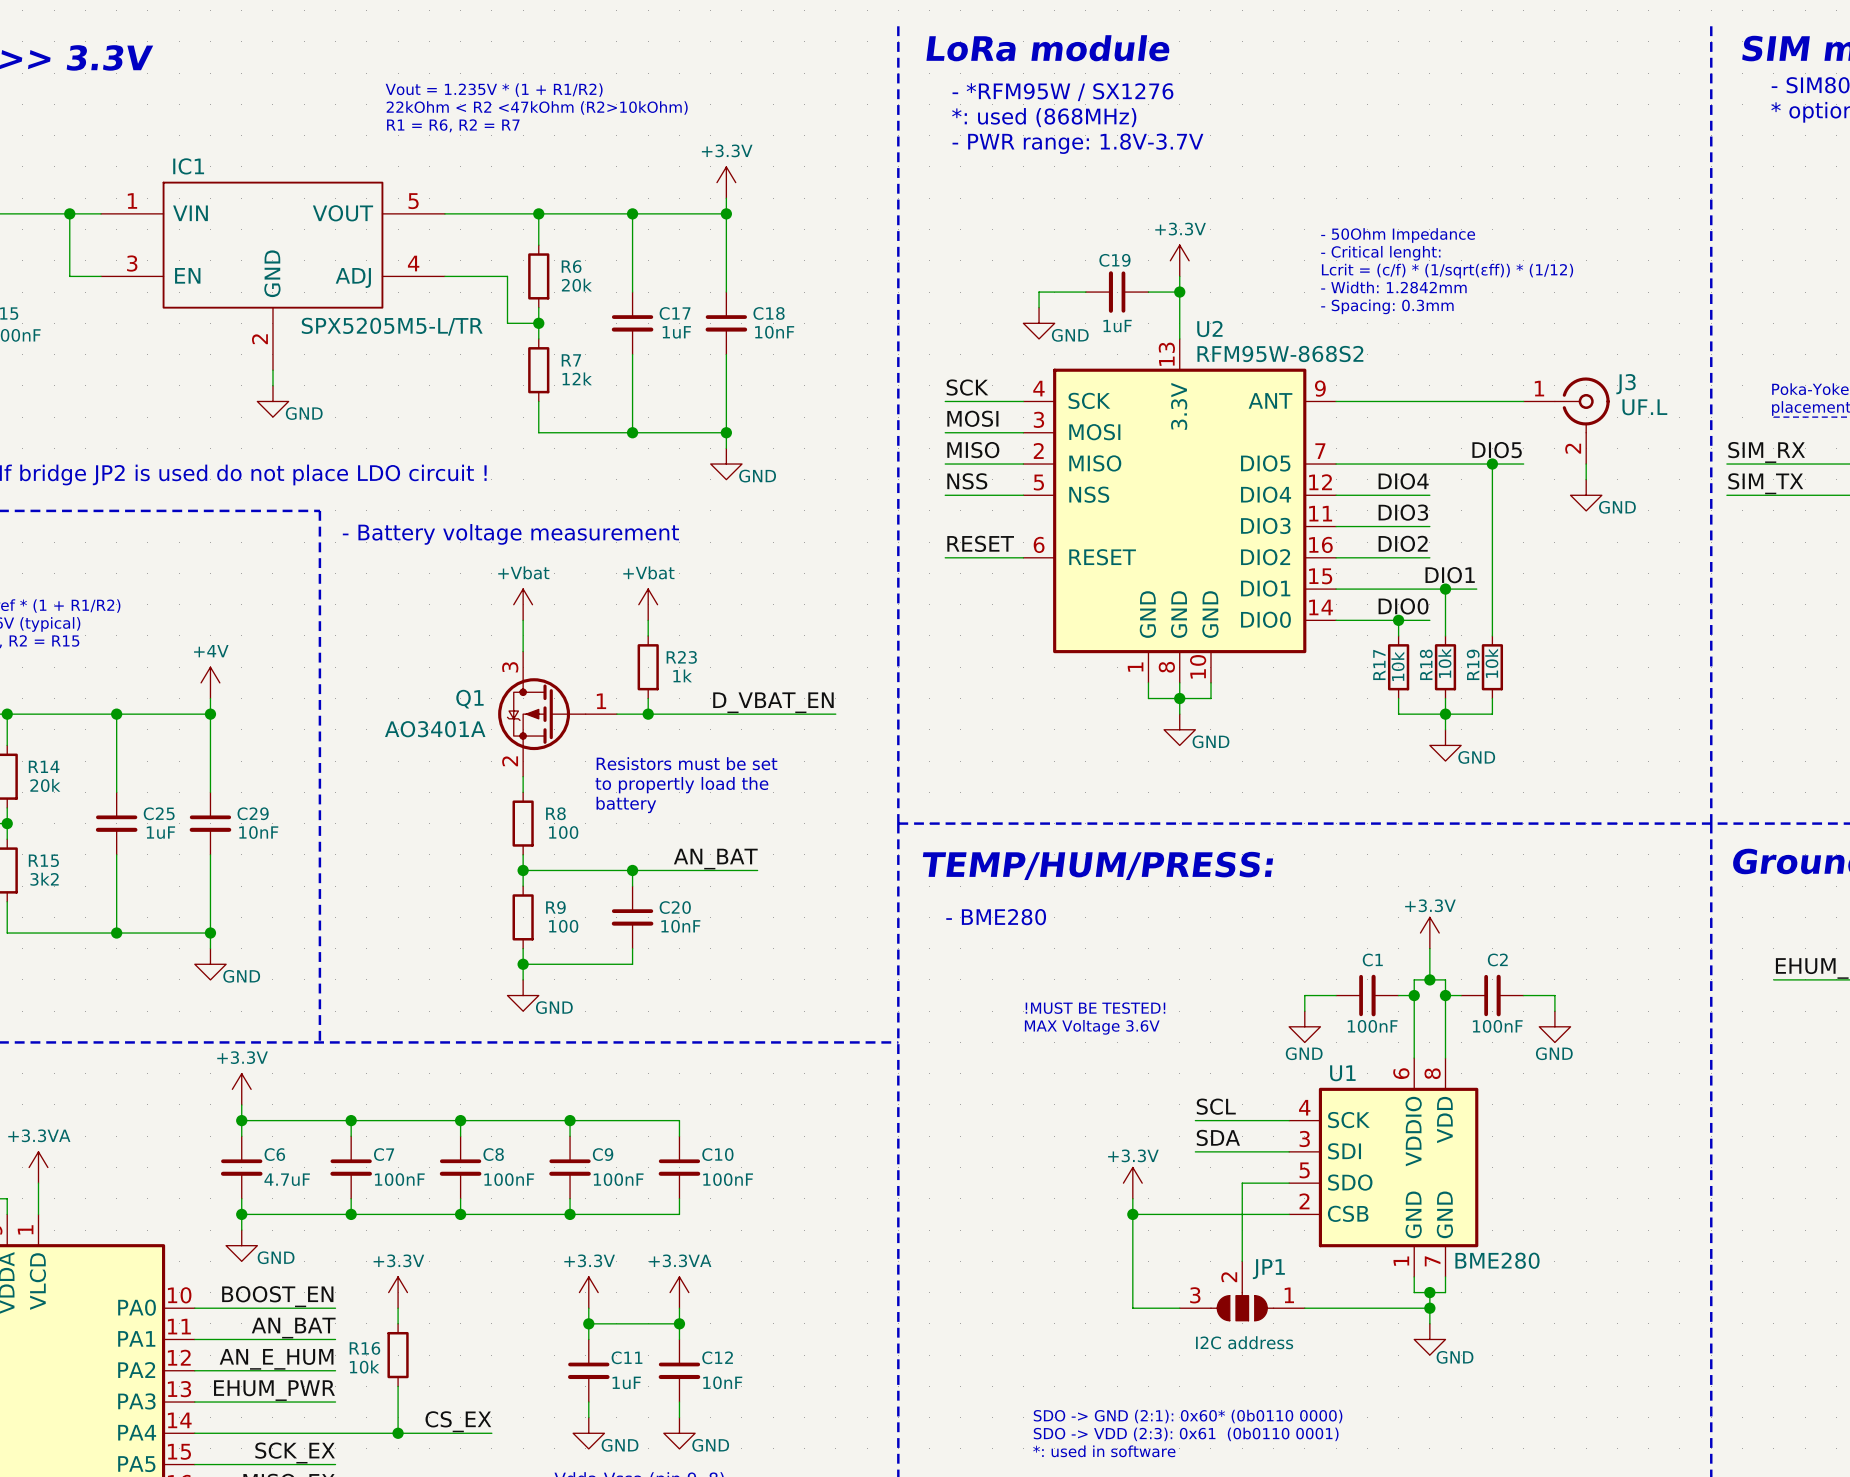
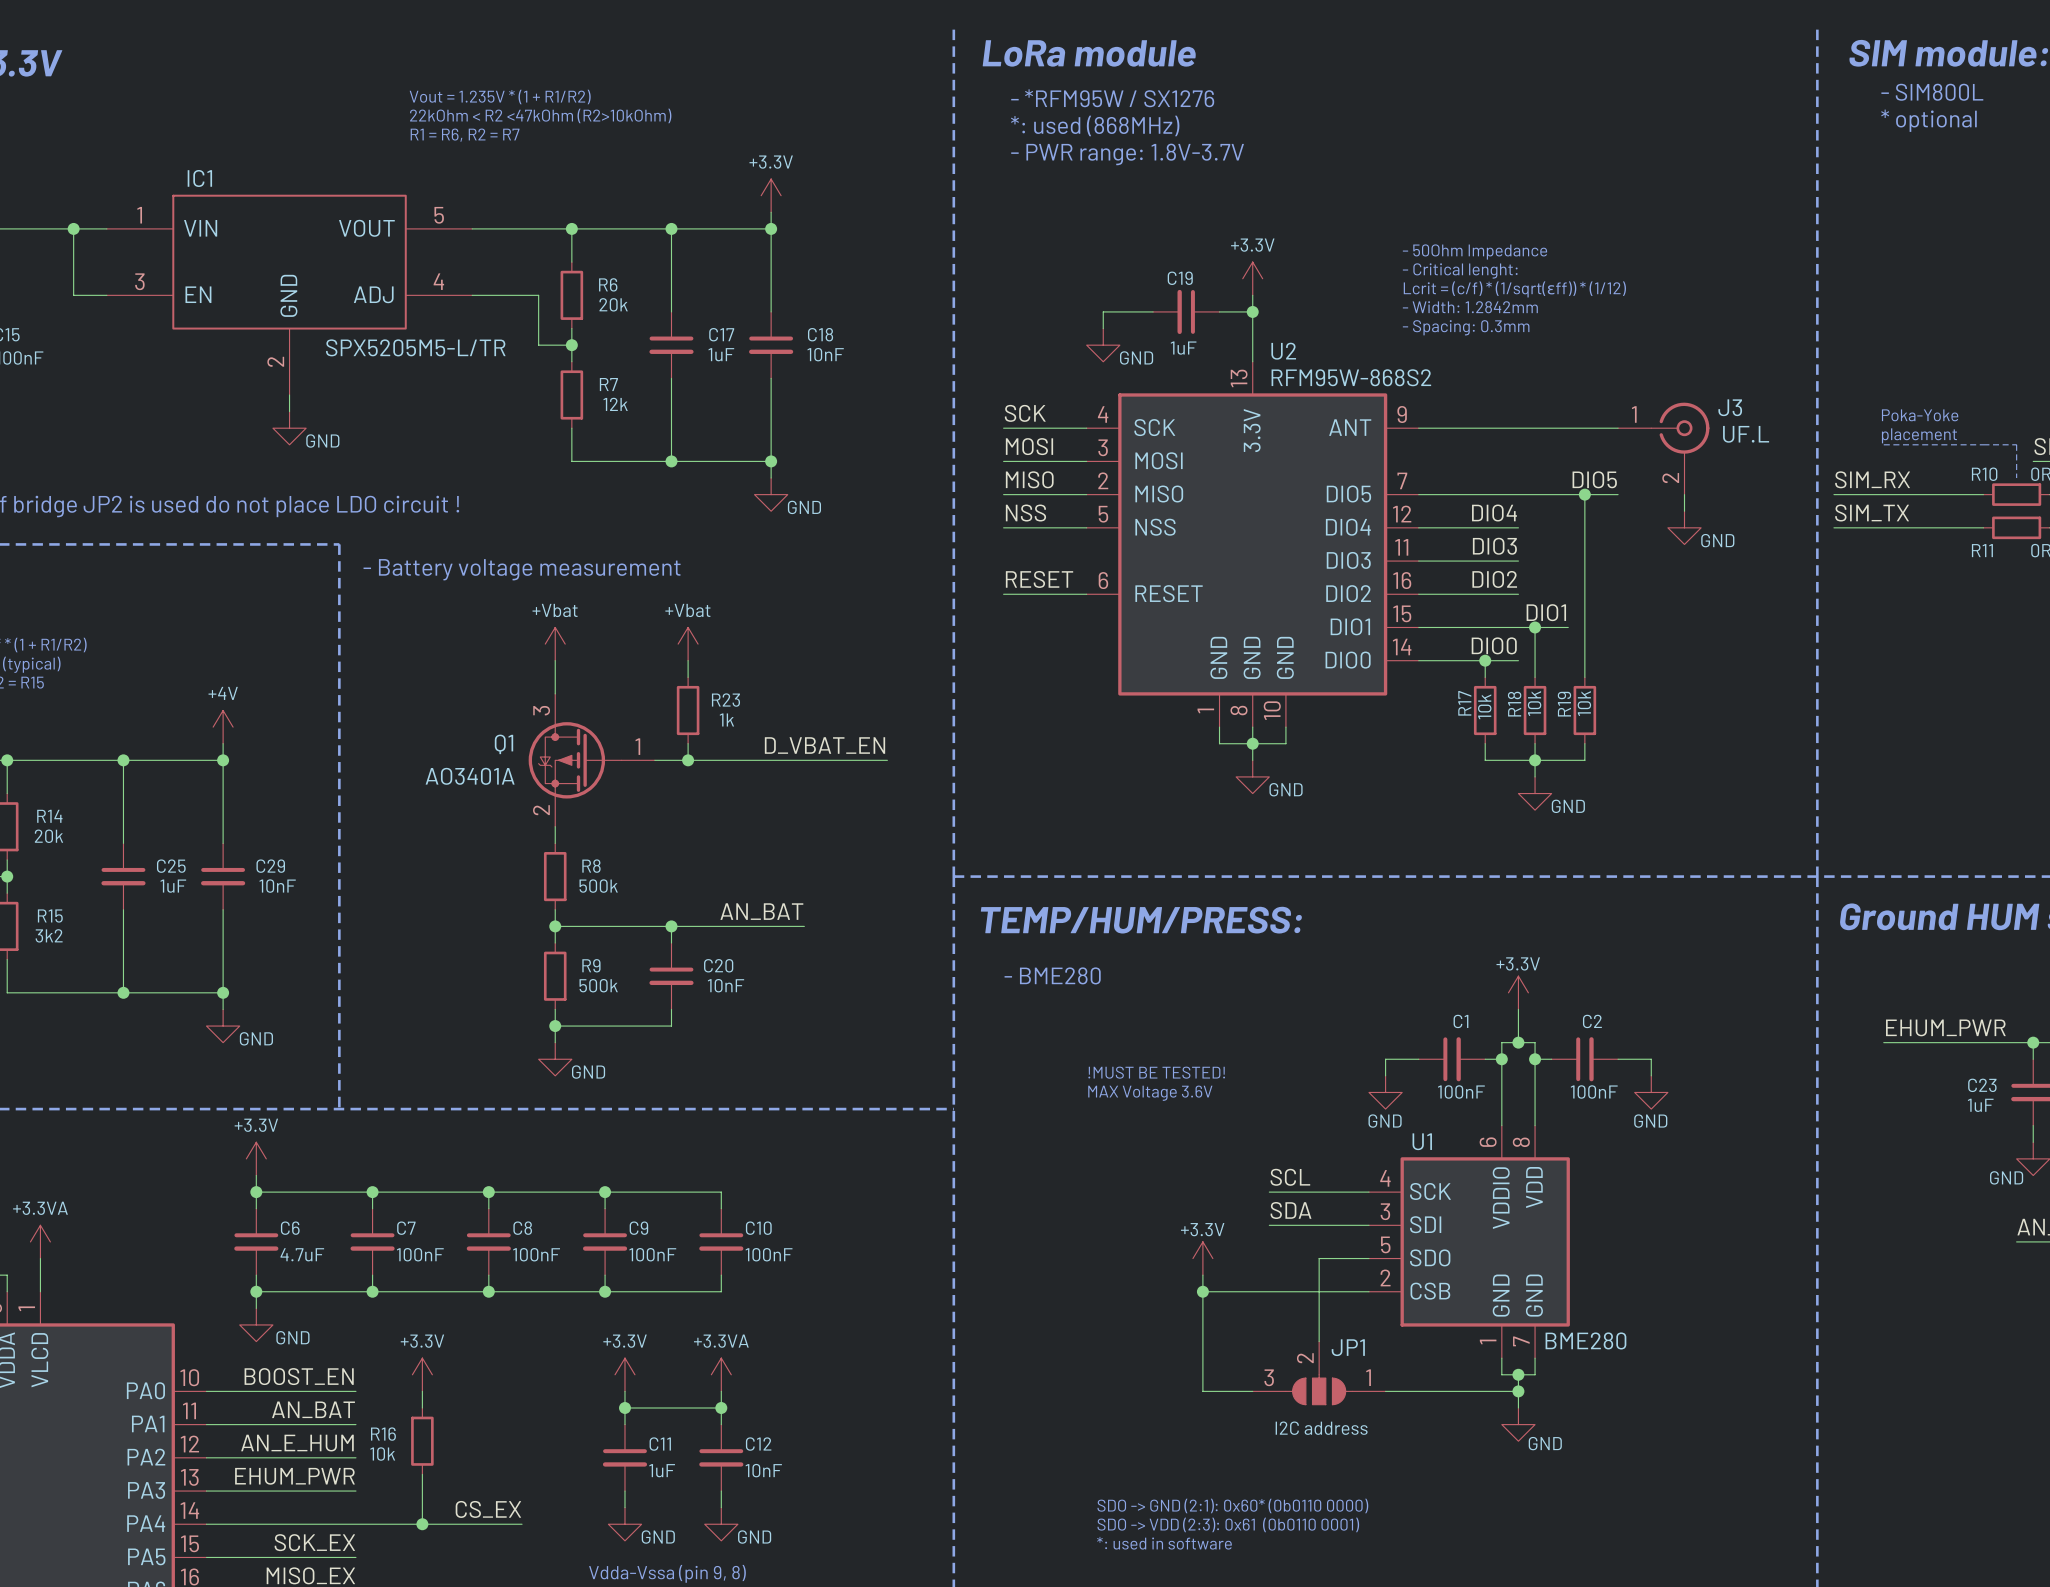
text: Resistors must be set (687, 763) -> none
text: to propertly load the (681, 785) -> none
text: battery (626, 804) -> none
R8 value: 100 (563, 832) -> 500k (598, 886)
R9 value: 100 (563, 926) -> 500k (598, 985)

